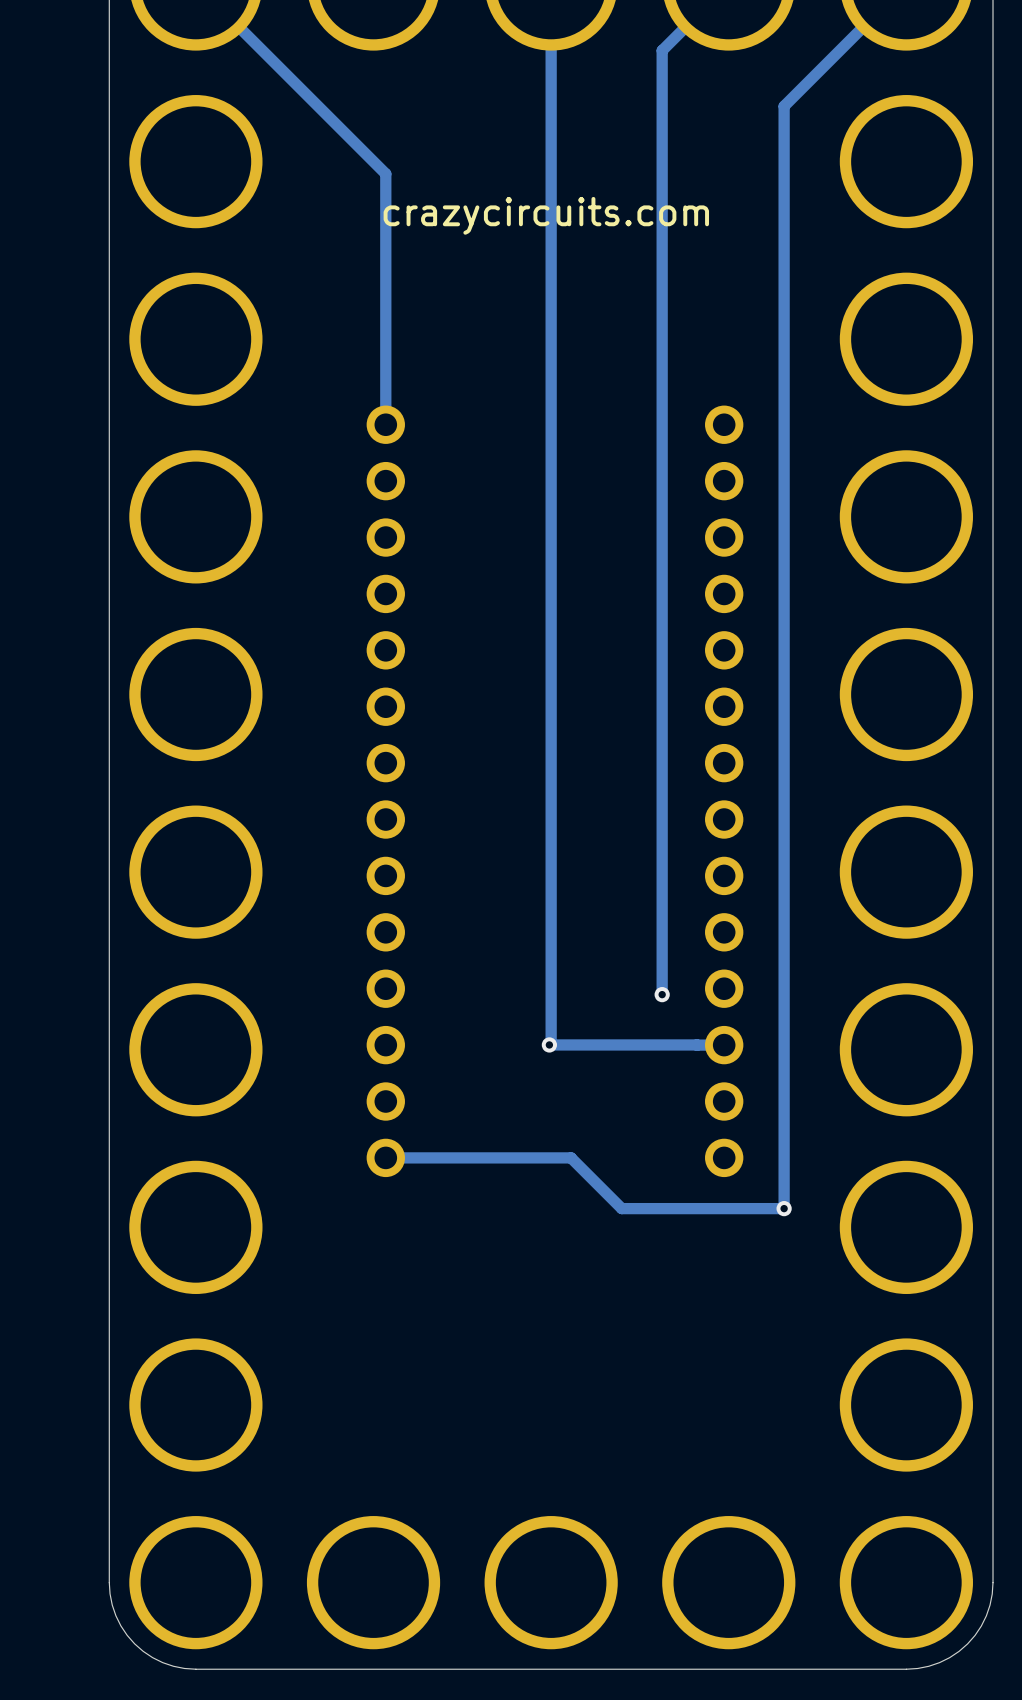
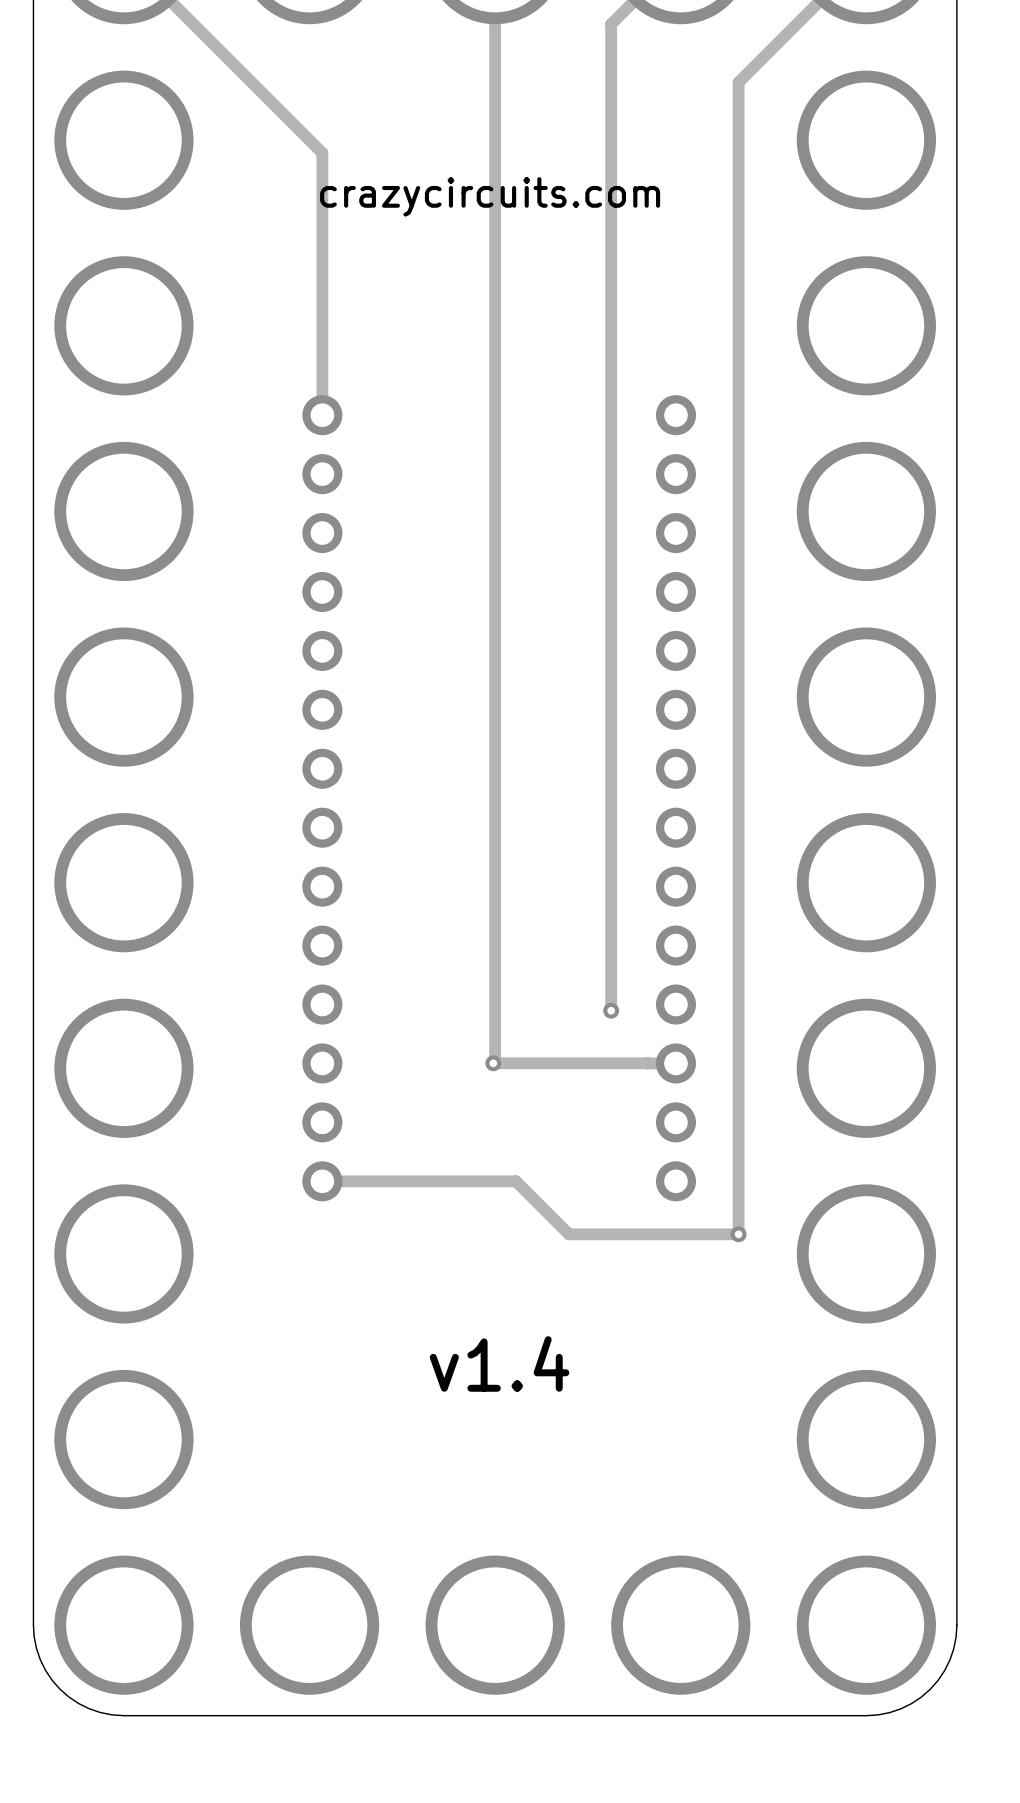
text: none -> v1.4 (499, 1363)

